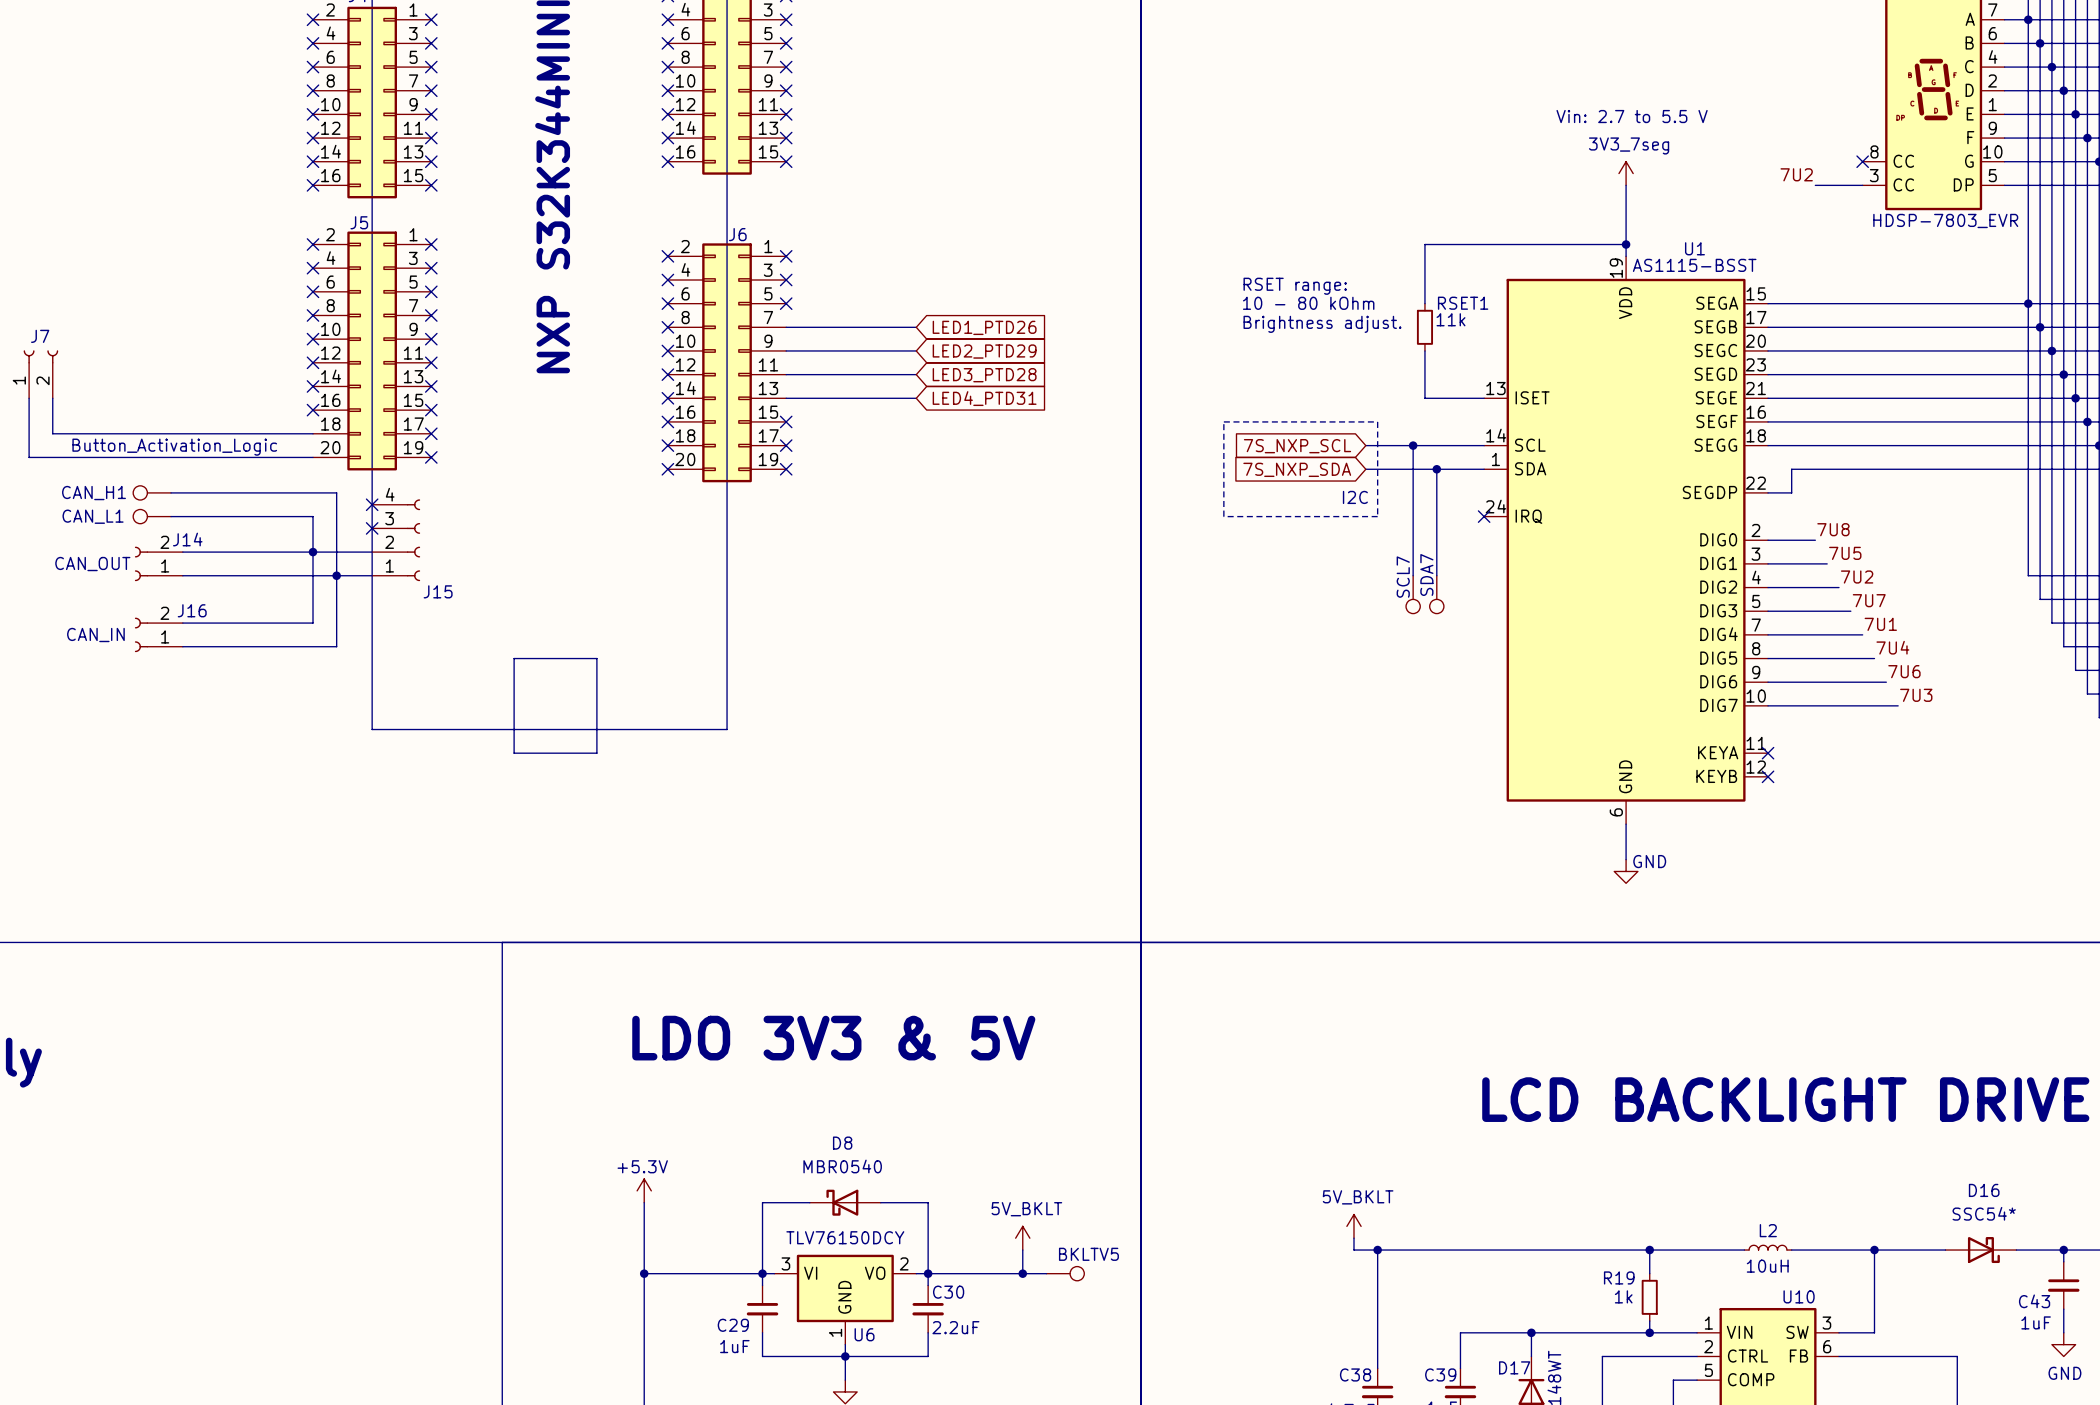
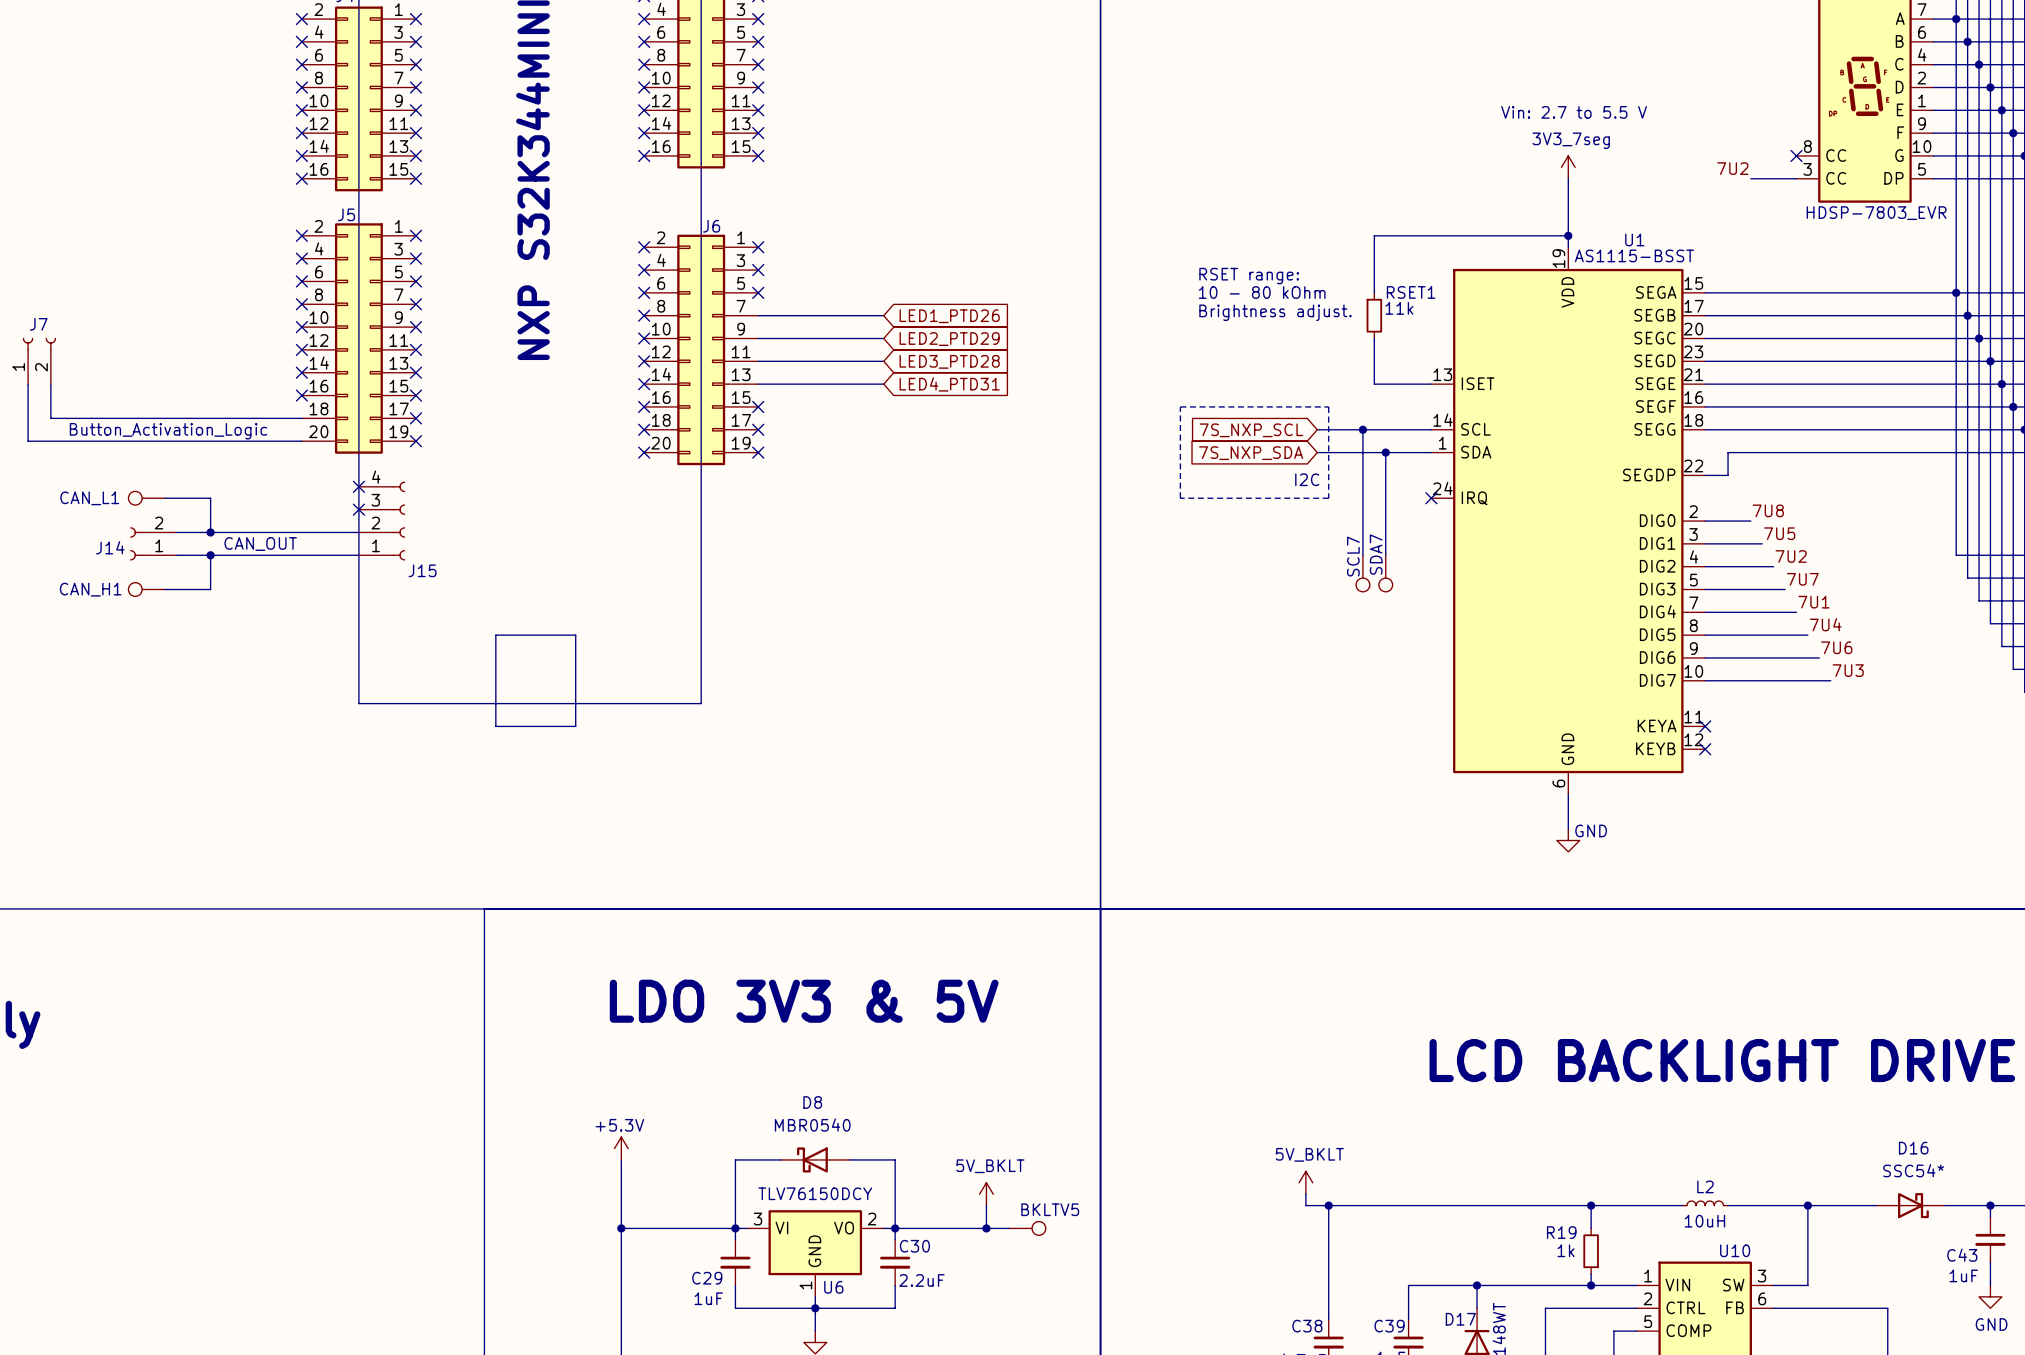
CAN_H1 position: (152, 492) -> (146, 589)
wire: (171, 492) (336, 492) (336, 646) (182, 646) -> none
wire: (218, 516) (313, 516) (313, 623) (182, 623) -> (210, 498) (210, 532)
J14 name position: J14 (187, 539) -> J14 (110, 547)
junction: none -> (210, 532)
junction: (313, 552) -> none
J14 value position: CAN_OUT (92, 564) -> CAN_OUT (260, 543)
wire: none -> (210, 555) (210, 589) (164, 589)
junction: none -> (210, 555)
junction: (336, 575) -> none
J16: CAN_IN (158, 634) -> none

